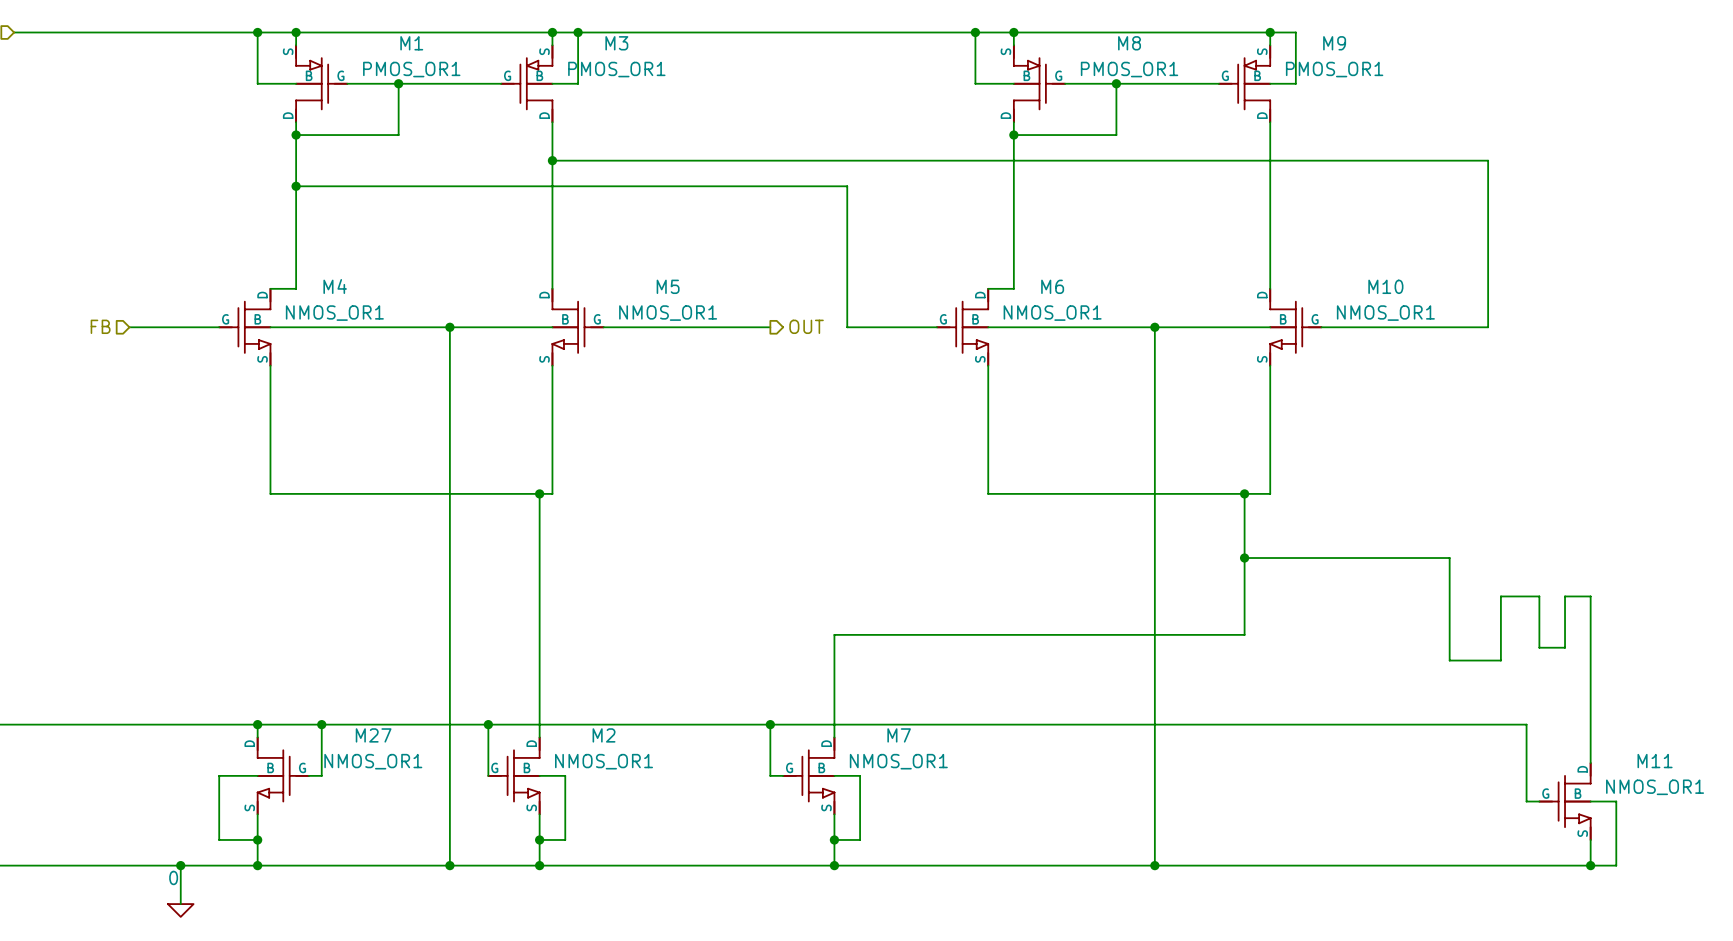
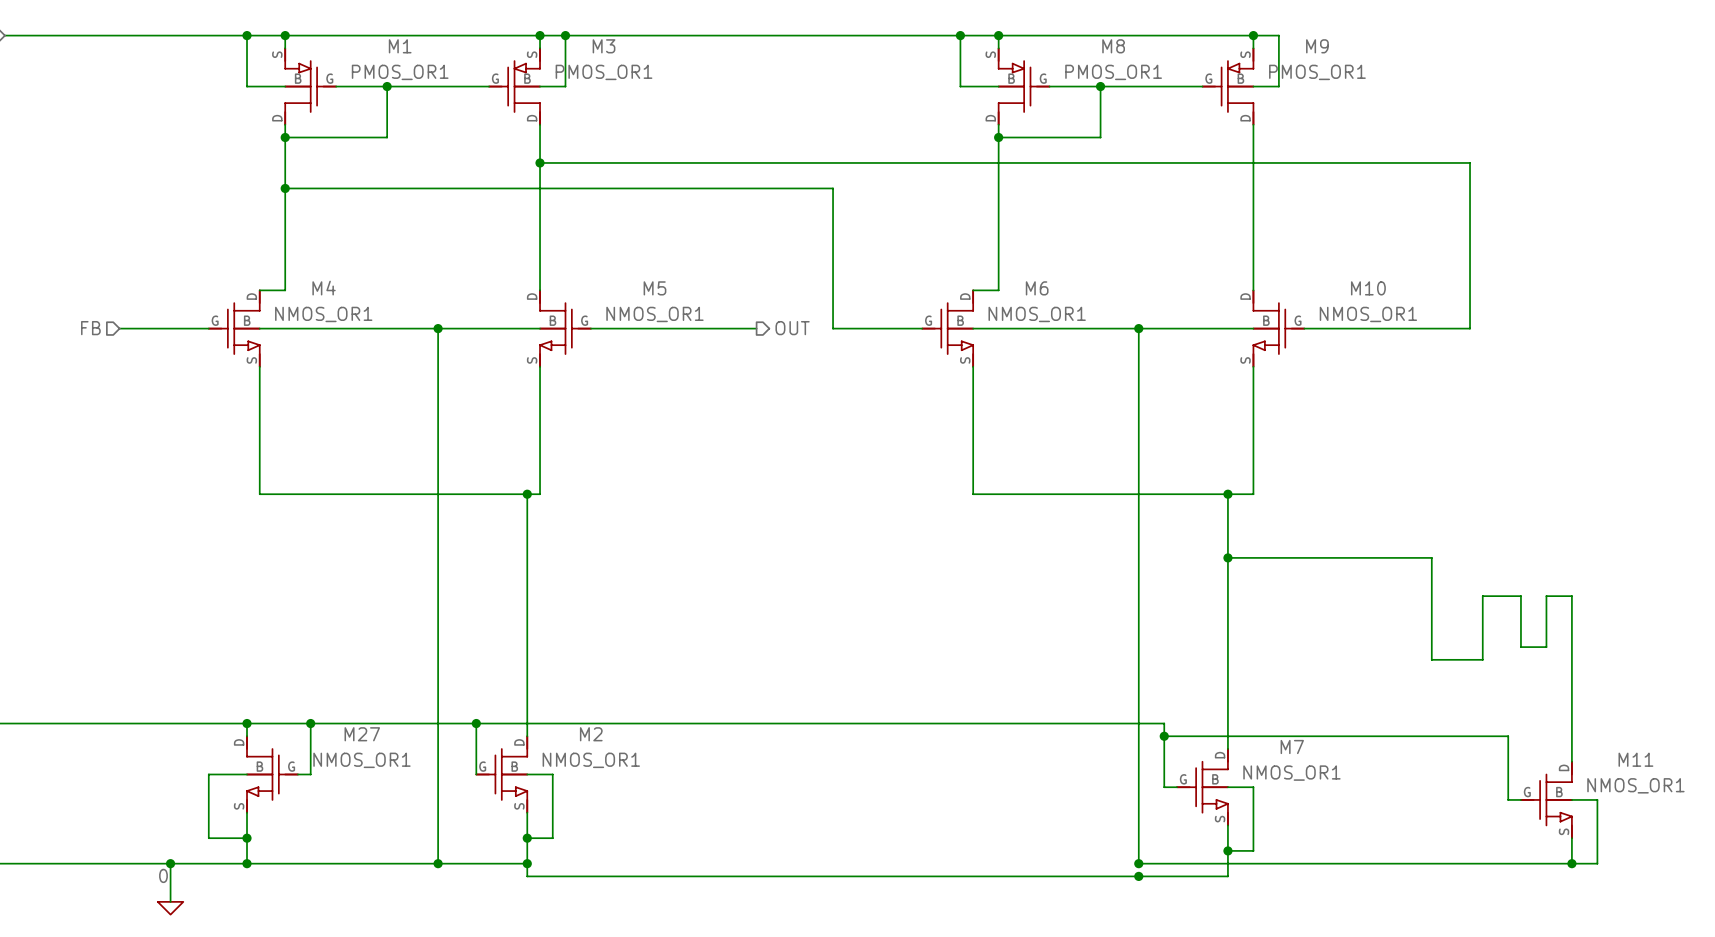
wire: (1244, 634) (834, 634) (834, 737) -> (1227, 634) (1227, 749)
wire: (770, 724) (770, 775) (783, 775) -> none
junction: (770, 724) -> none
wire: (1180, 724) (1526, 724) (1526, 737) -> (1164, 736) (1508, 736)
wire: none -> (1164, 723) (1164, 787) (1177, 787)
junction: none -> (1164, 736)
M7 position: (808, 775) -> (1202, 787)
wire: (834, 775) (860, 775) (860, 839) (834, 839) -> none
wire: none -> (1227, 787) (1253, 787) (1253, 850) (1227, 850)
wire: (834, 814) (834, 865) -> none
junction: (834, 839) -> none
junction: none -> (1227, 850)
wire: (539, 865) (1154, 865) -> (527, 863) (527, 876) (1227, 876) (1227, 825)
junction: (834, 865) -> none
junction: none -> (1138, 876)

